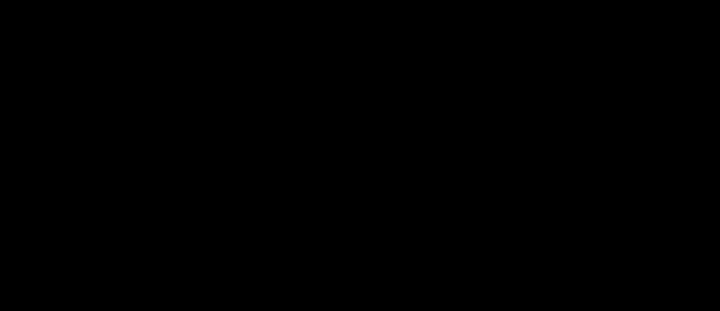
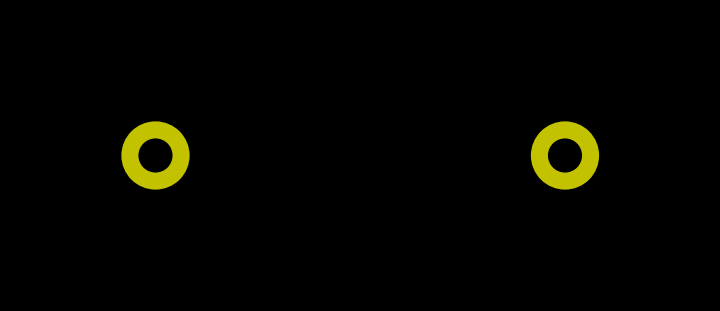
part: none -> (155, 155)
part: none -> (564, 155)

